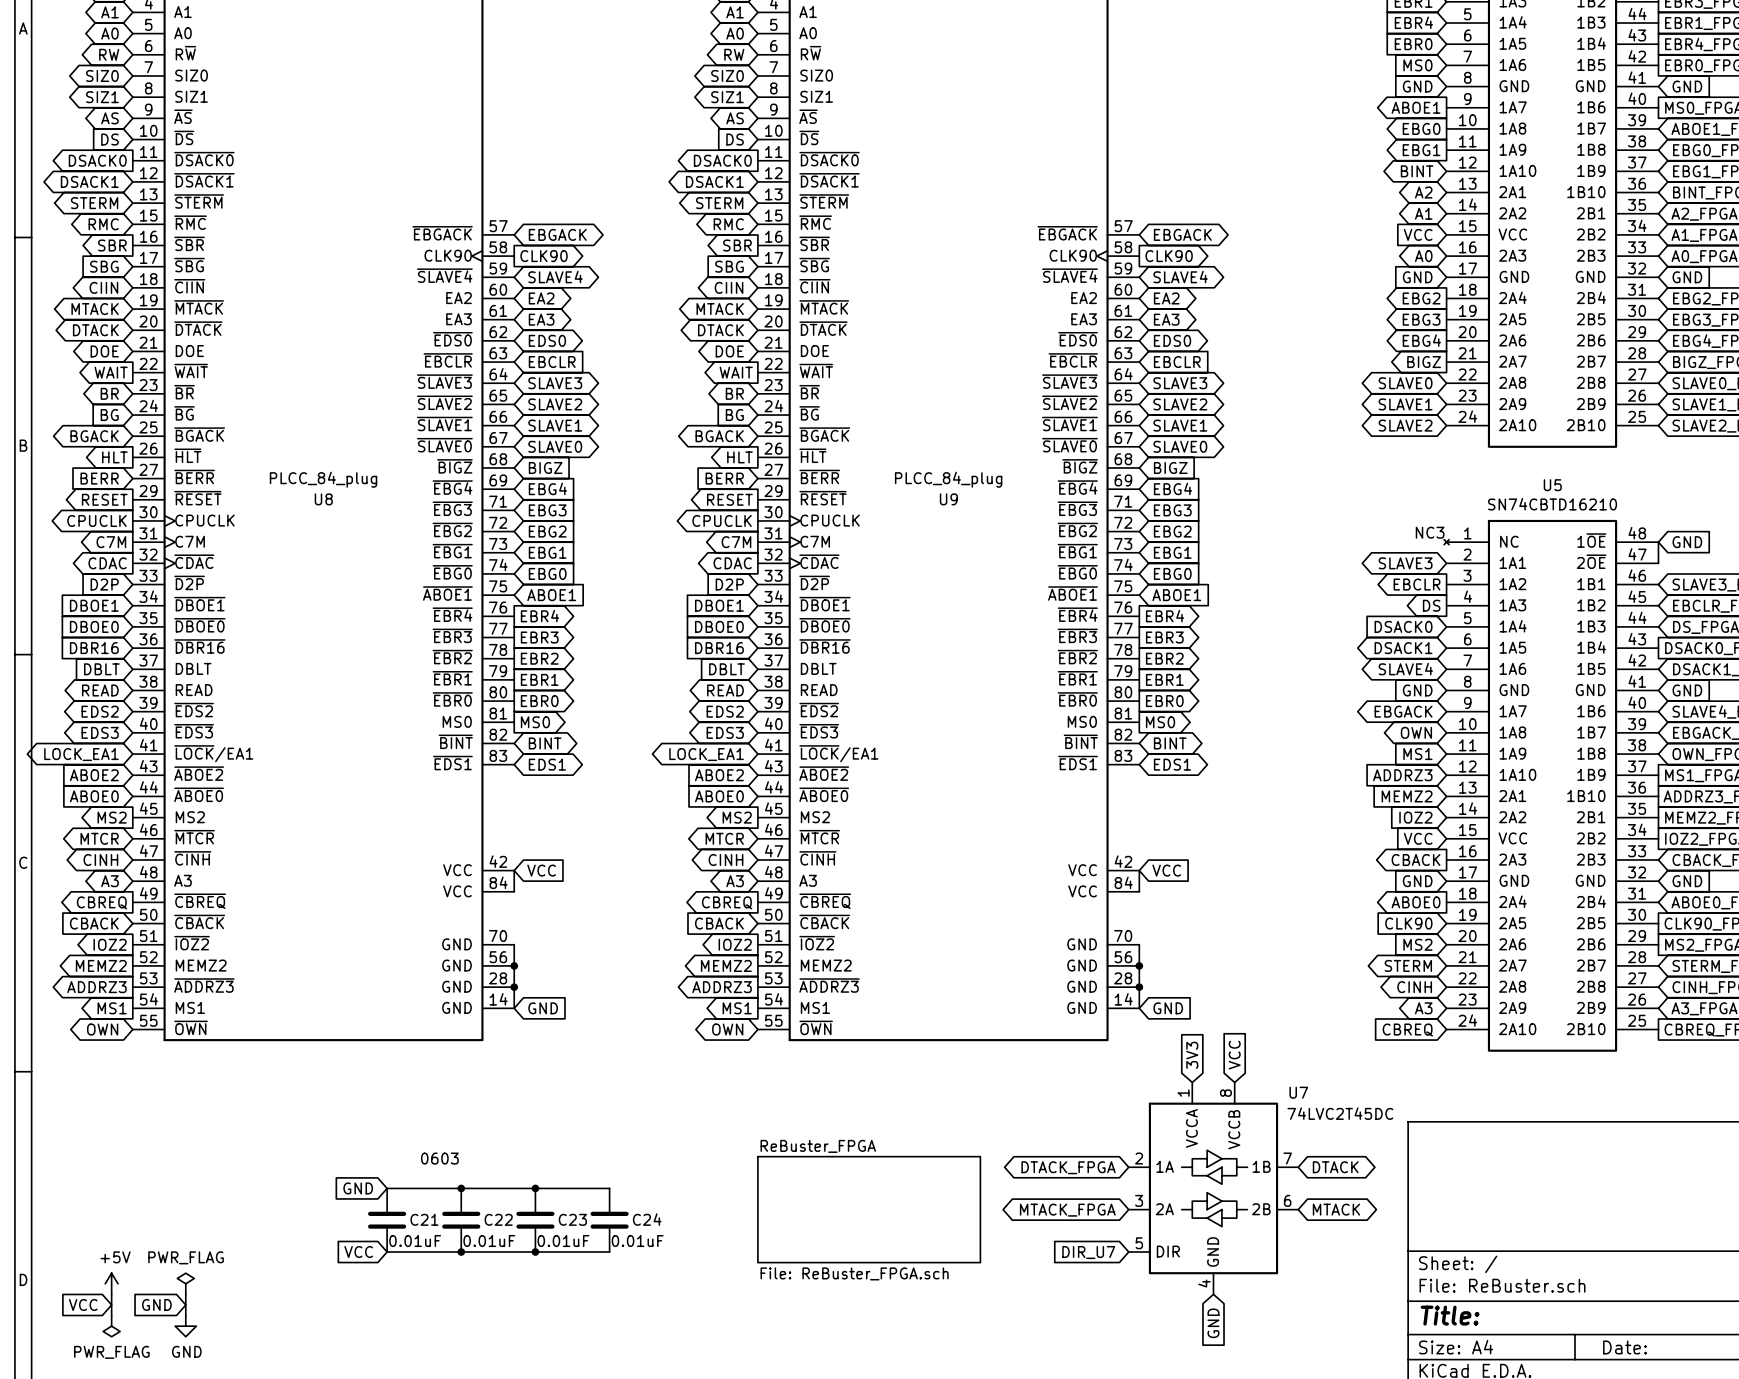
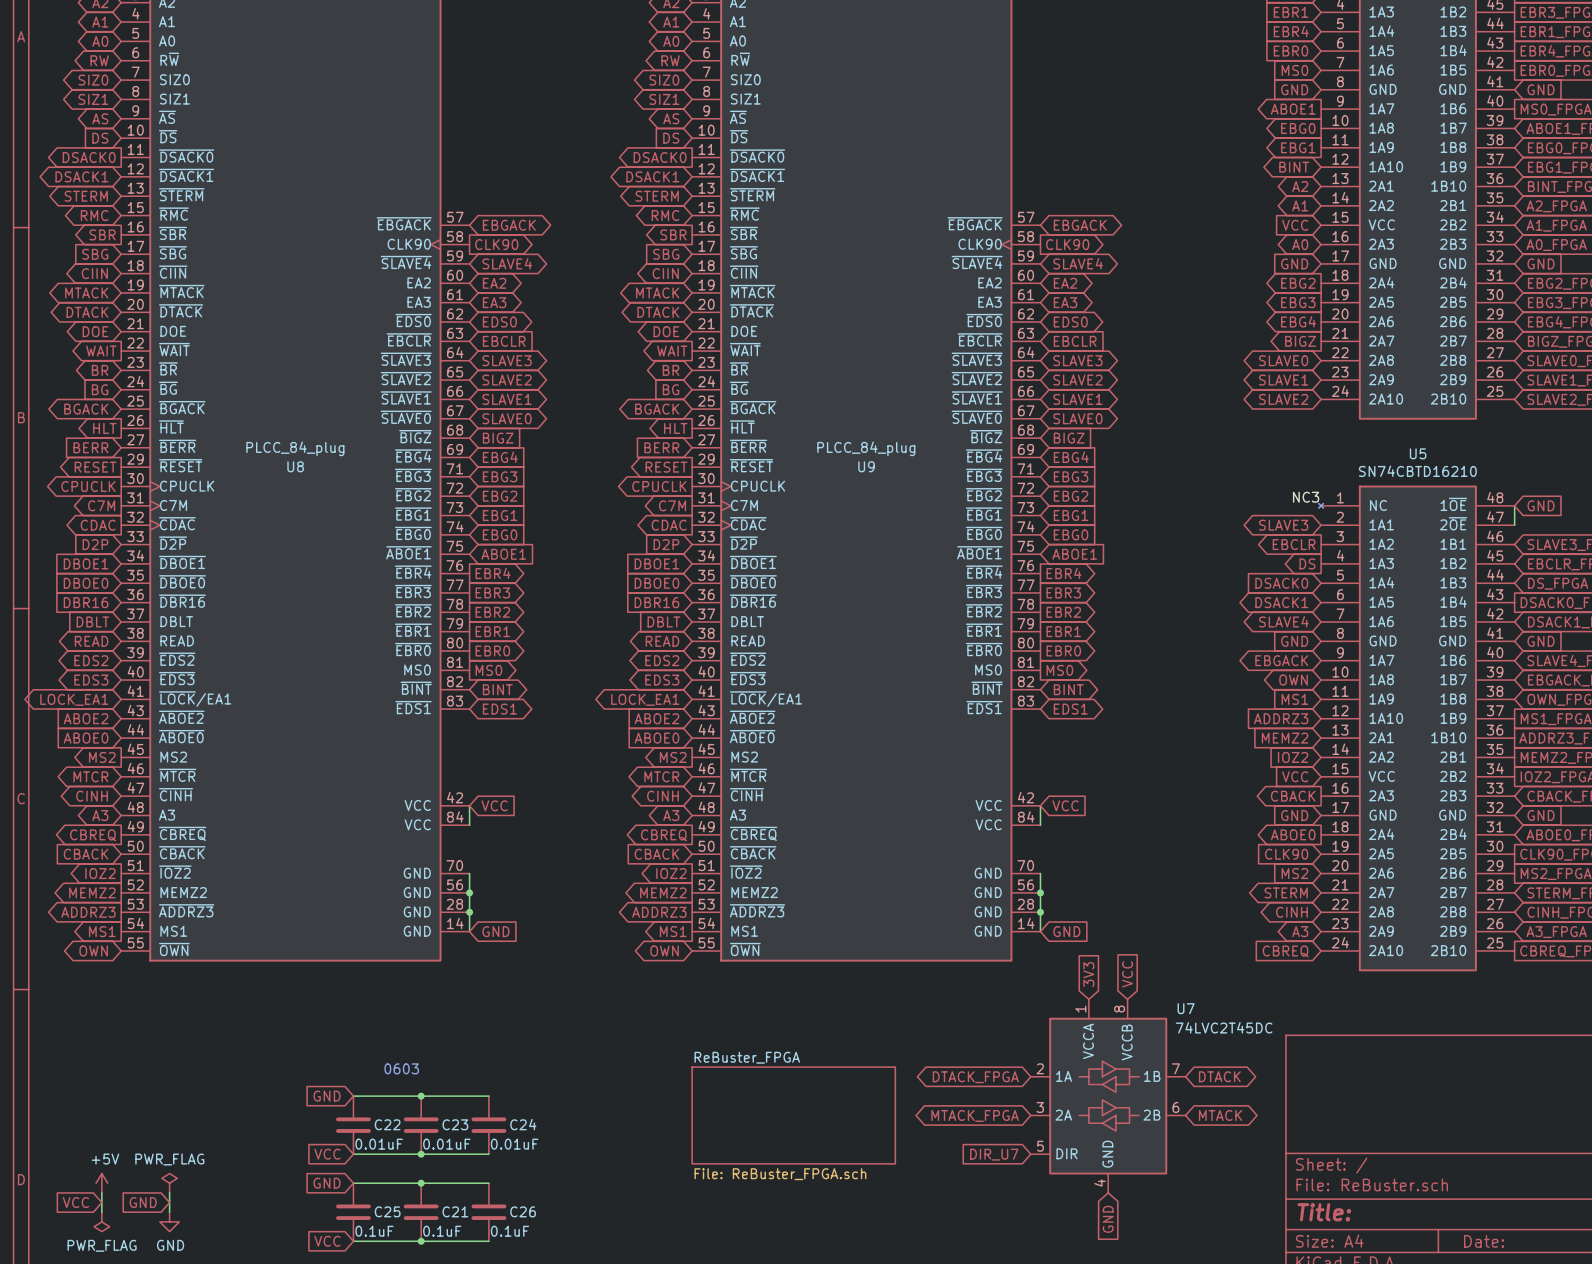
wire: (535, 1188) (609, 1188) -> none
junction: (535, 1188) -> none
C21 name: C21 (424, 1219) -> C22 (387, 1124)
C22 name: C22 (498, 1219) -> C23 (455, 1124)
C23 name: C23 (572, 1219) -> C24 (523, 1124)
C24: 0.01uF (609, 1220) -> none
wire: (535, 1252) (609, 1252) -> none
junction: (535, 1252) -> none
global label: none -> GND (327, 1183)
wire: none -> (353, 1183) (488, 1183)
junction: none -> (421, 1183)
C25: none -> 0.1uF (353, 1212)
C21: none -> 0.1uF (421, 1212)
C26: none -> 0.1uF (488, 1212)
global label: none -> VCC (327, 1241)
wire: none -> (353, 1241) (488, 1241)
junction: none -> (421, 1241)

